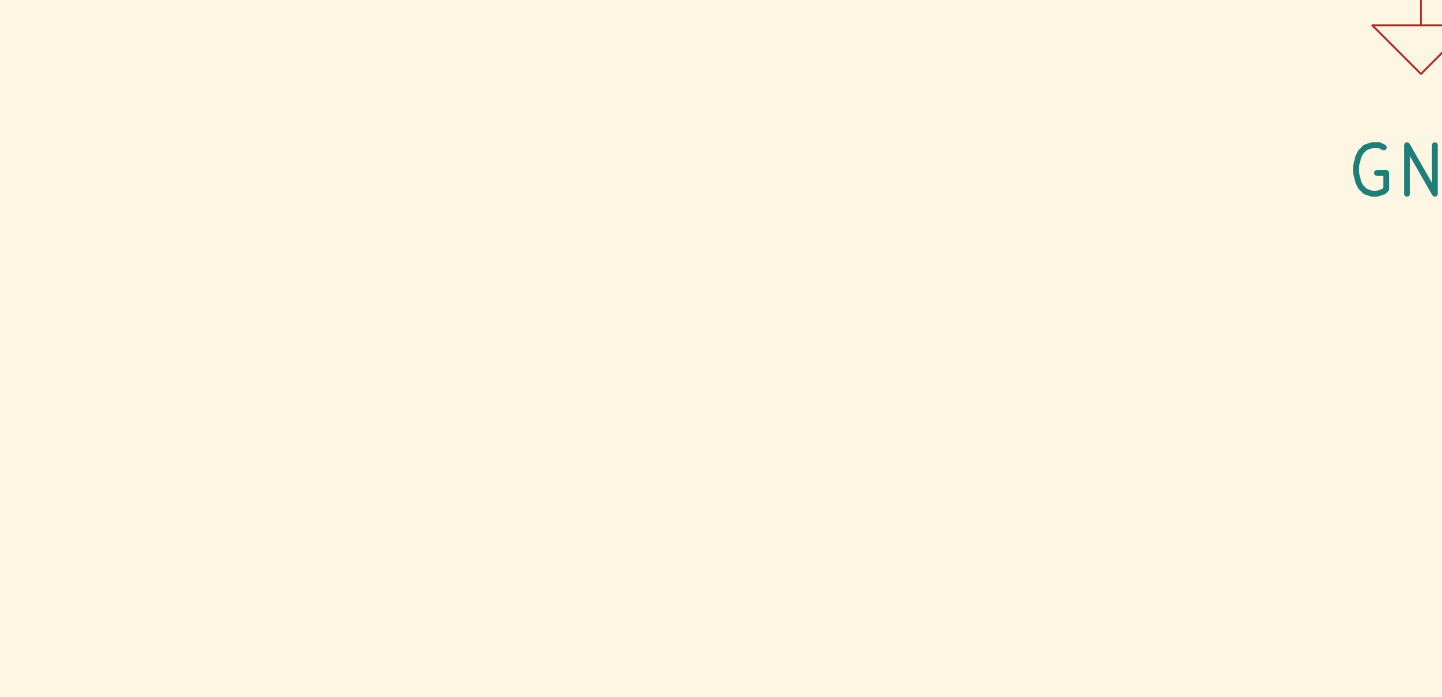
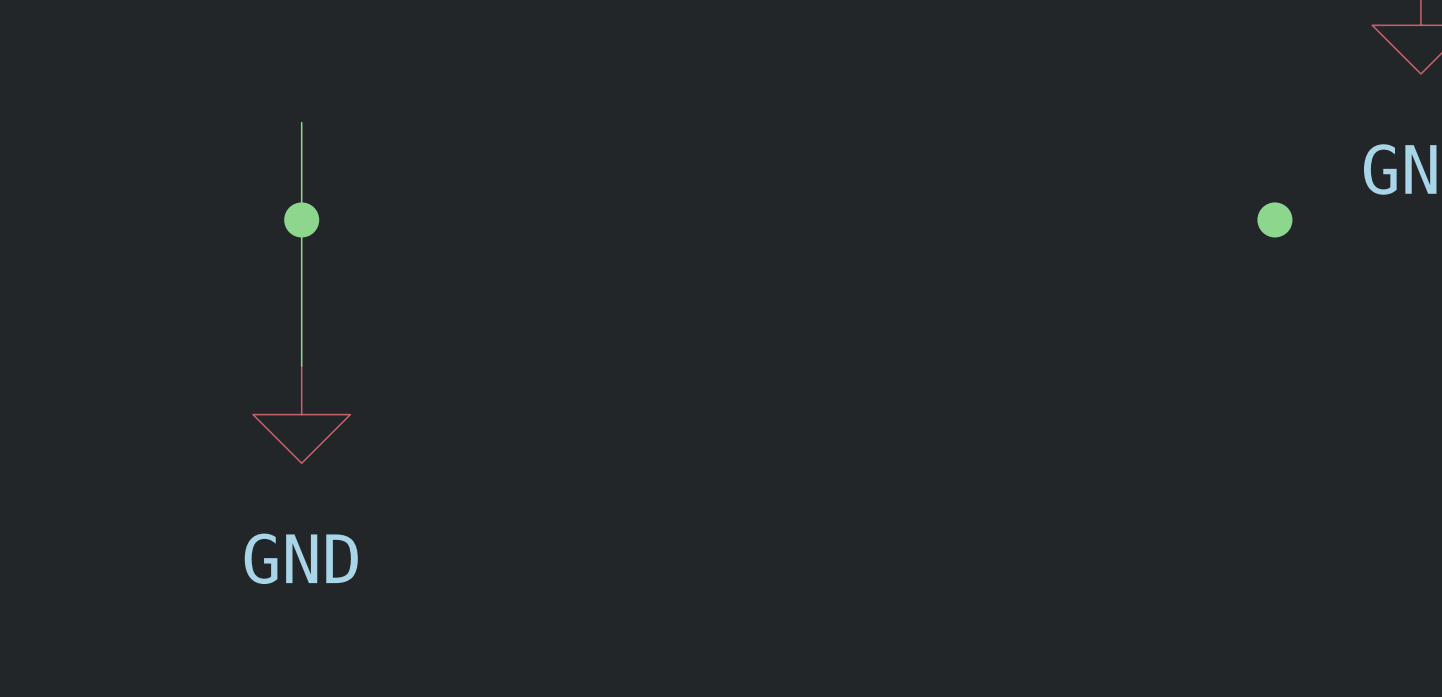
wire: none -> (301, 122) (301, 365)
junction: none -> (301, 219)
junction: none -> (1274, 219)
power symbol: none -> GND (301, 414)

